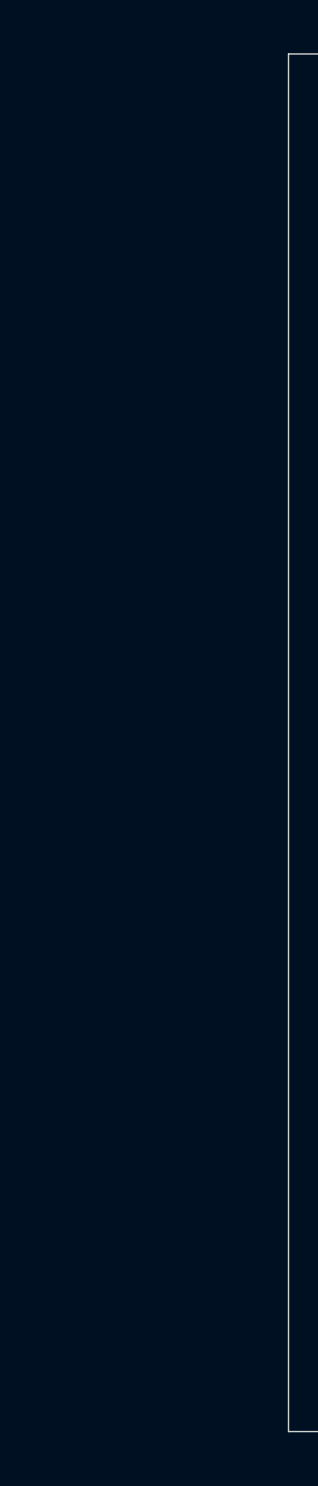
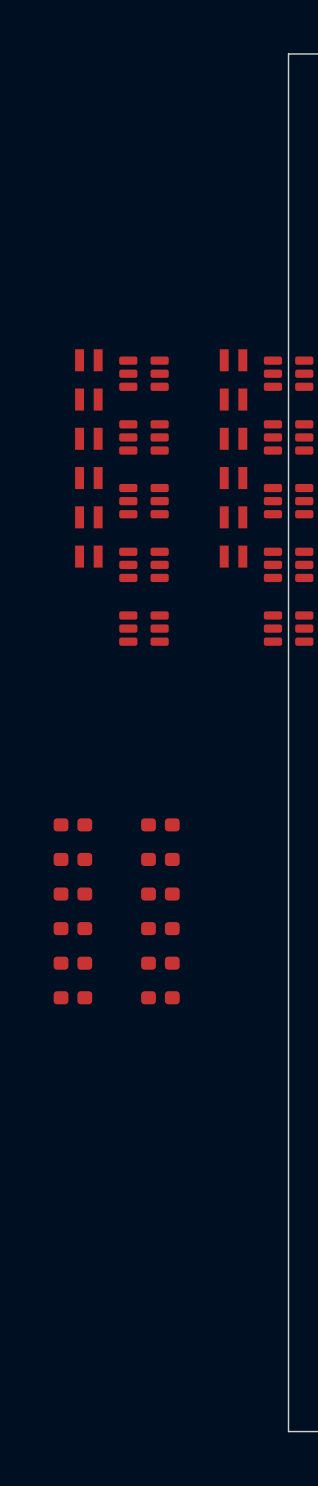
part: none -> (88, 360)
part: none -> (233, 360)
part: none -> (143, 373)
part: none -> (288, 373)
part: none -> (88, 399)
part: none -> (233, 399)
part: none -> (143, 437)
part: none -> (288, 437)
part: none -> (88, 438)
part: none -> (233, 438)
part: none -> (88, 478)
part: none -> (233, 478)
part: none -> (143, 501)
part: none -> (288, 501)
part: none -> (88, 517)
part: none -> (233, 517)
part: none -> (88, 556)
part: none -> (233, 556)
part: none -> (143, 564)
part: none -> (288, 564)
part: none -> (143, 628)
part: none -> (288, 628)
part: none -> (72, 824)
part: none -> (160, 824)
part: none -> (72, 859)
part: none -> (160, 859)
part: none -> (72, 894)
part: none -> (160, 894)
part: none -> (72, 928)
part: none -> (160, 928)
part: none -> (72, 963)
part: none -> (160, 963)
part: none -> (72, 997)
part: none -> (160, 997)

